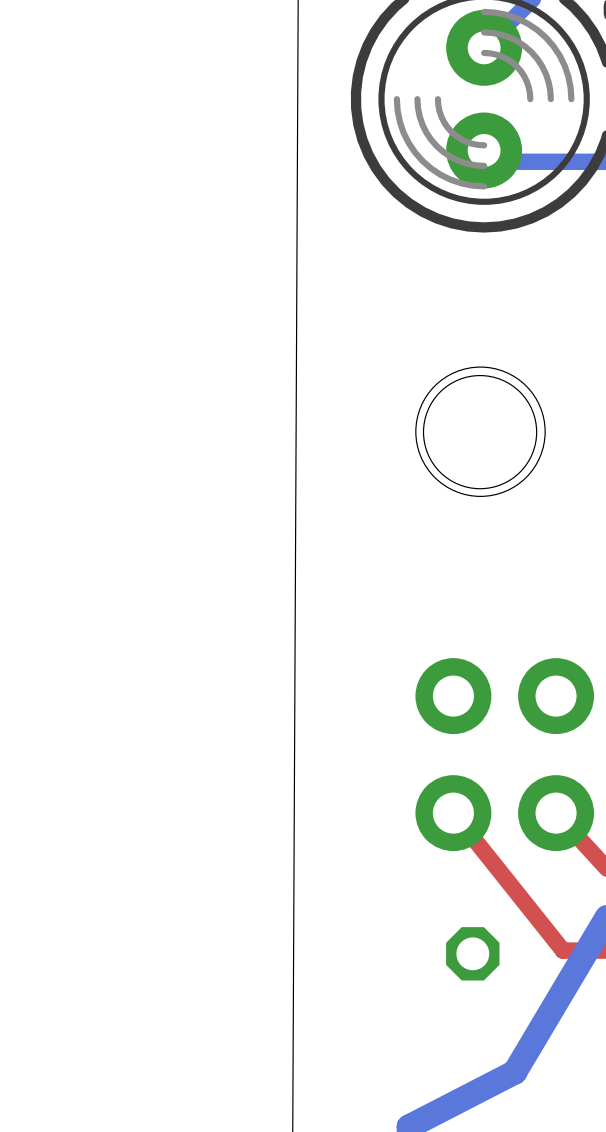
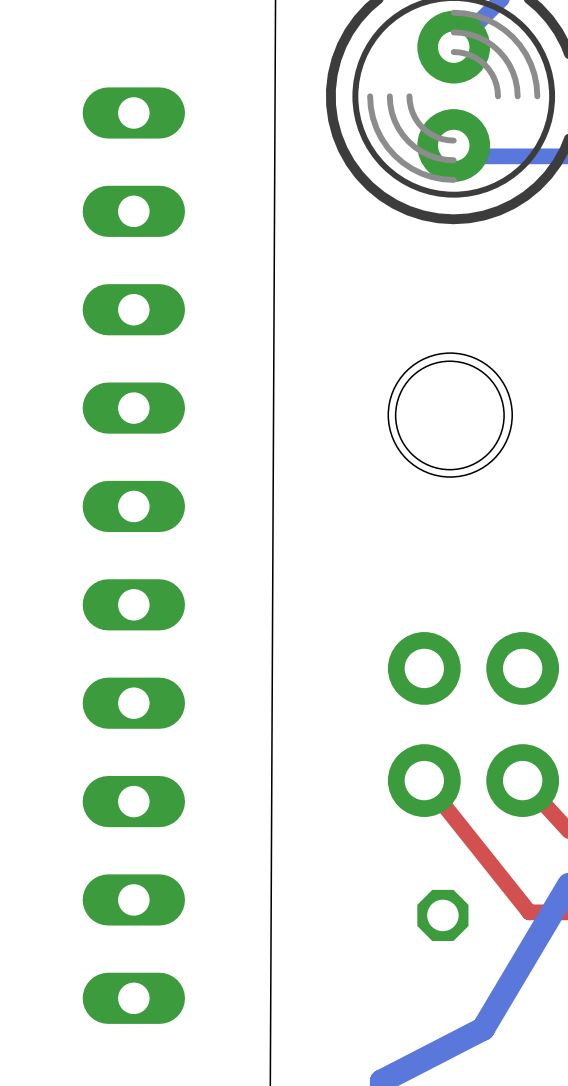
part: none -> (133, 555)

